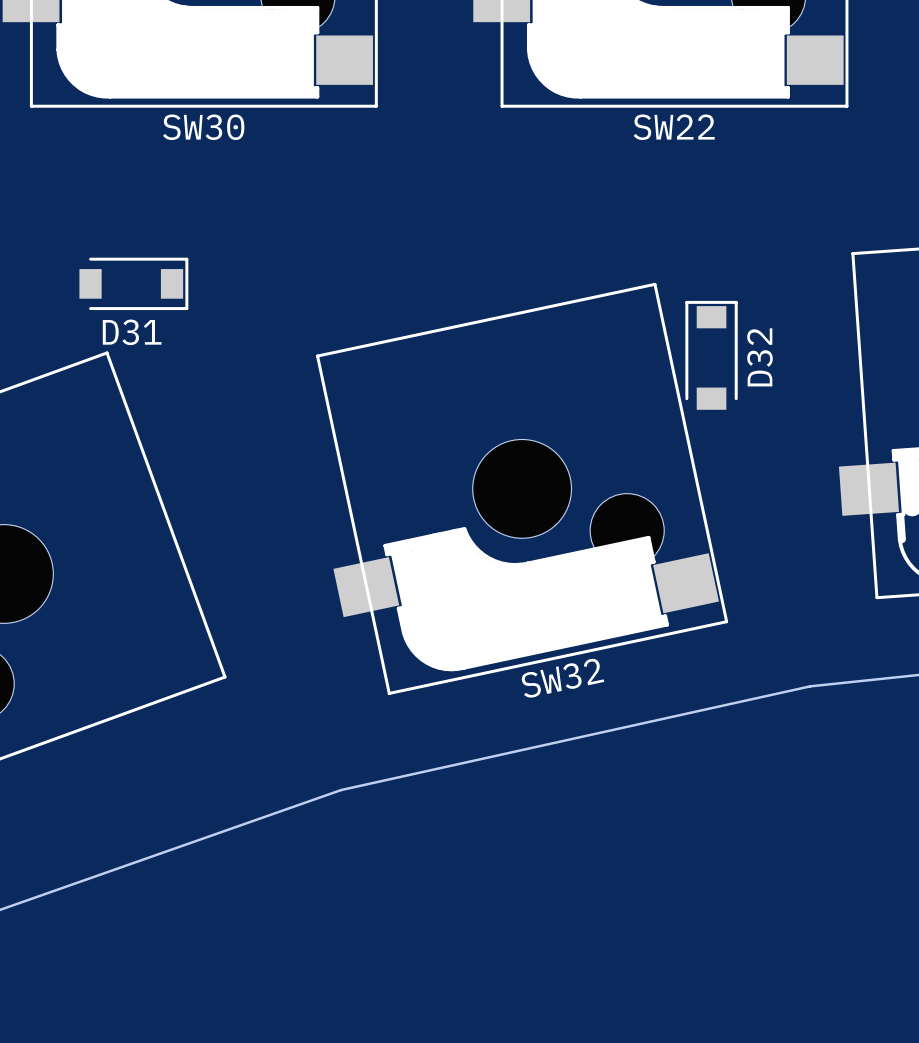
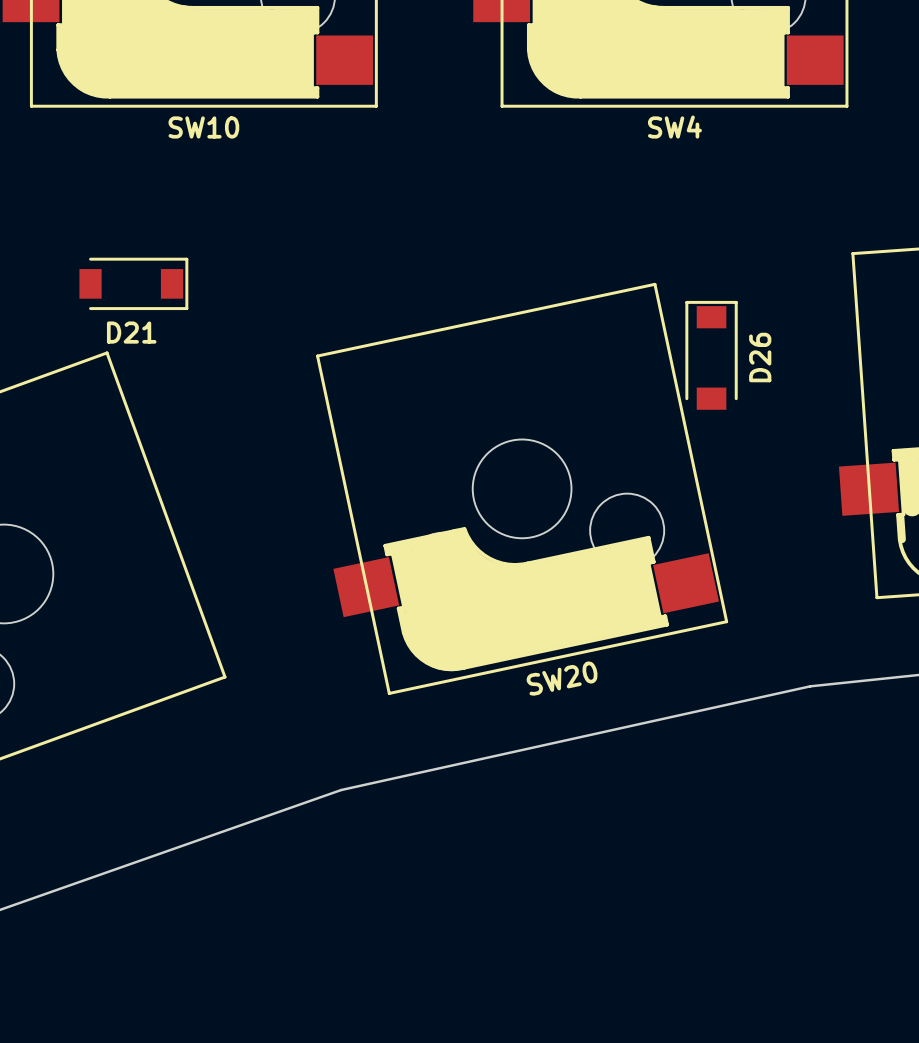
SW30 name: SW30 (203, 127) -> SW10 (203, 127)
SW22 name: SW22 (674, 127) -> SW4 (674, 127)
D31 name: D31 (132, 332) -> D21 (131, 332)
D32 name: D32 (759, 357) -> D26 (760, 357)
SW32 name: SW32 (562, 678) -> SW20 (562, 678)

